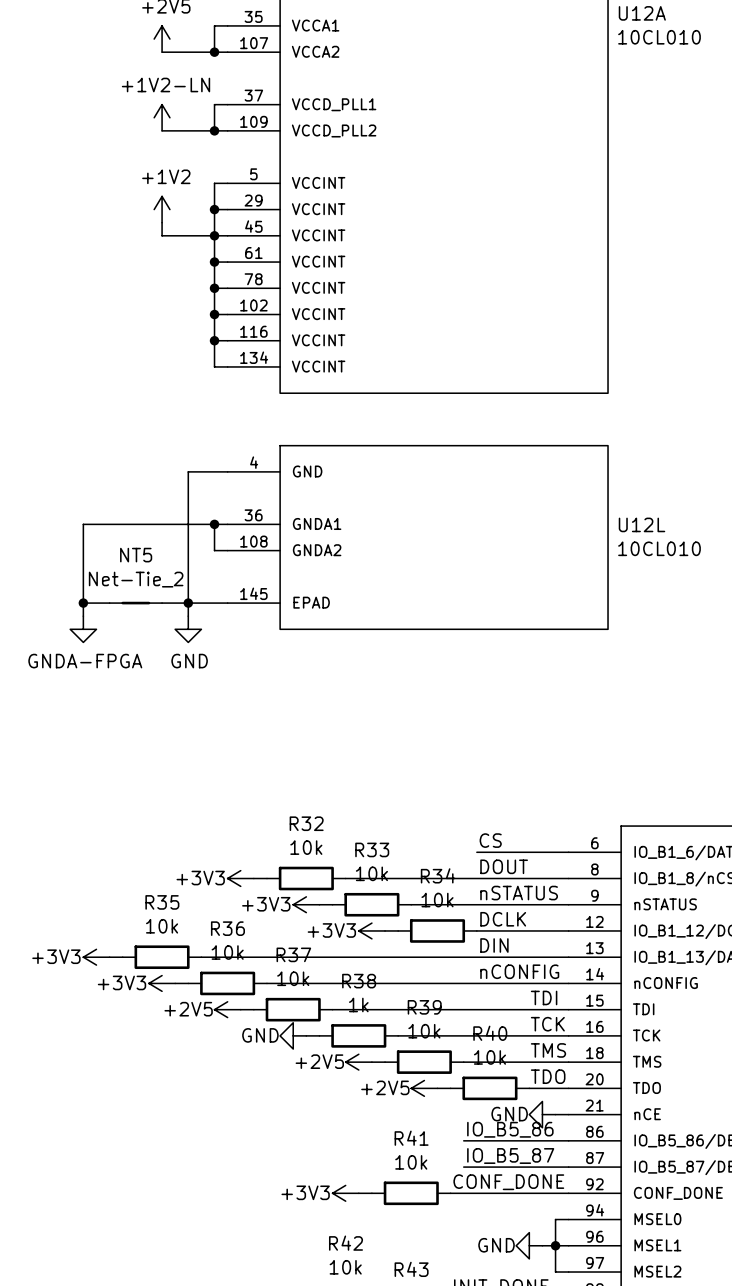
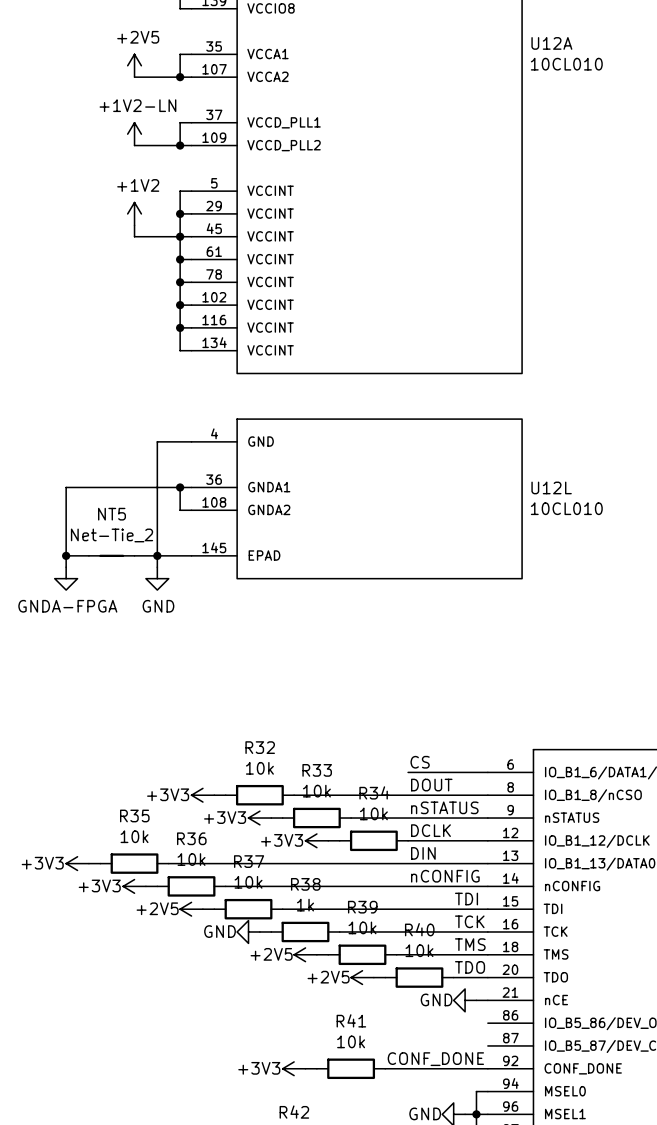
label: IO_B5_86 (510, 1129) -> none
wire: (463, 1140) (568, 1140) -> none
label: IO_B5_87 (510, 1155) -> none
wire: (463, 1167) (568, 1167) -> none

